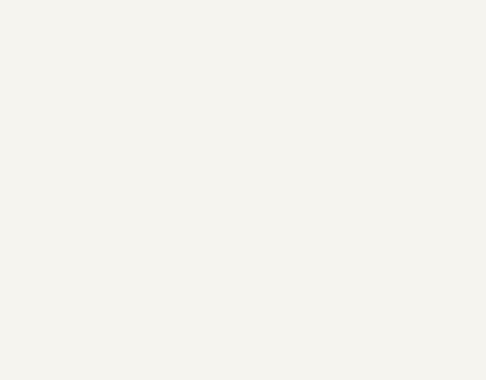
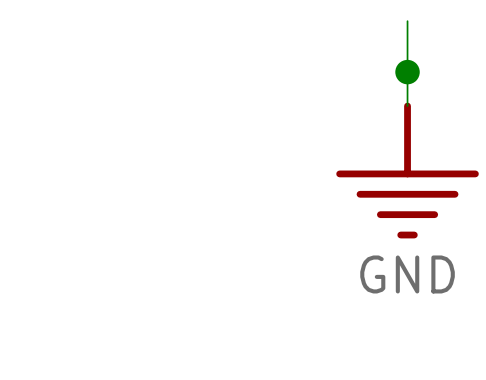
wire: none -> (407, 21) (407, 106)
junction: none -> (407, 72)
power symbol: none -> GND (407, 170)

